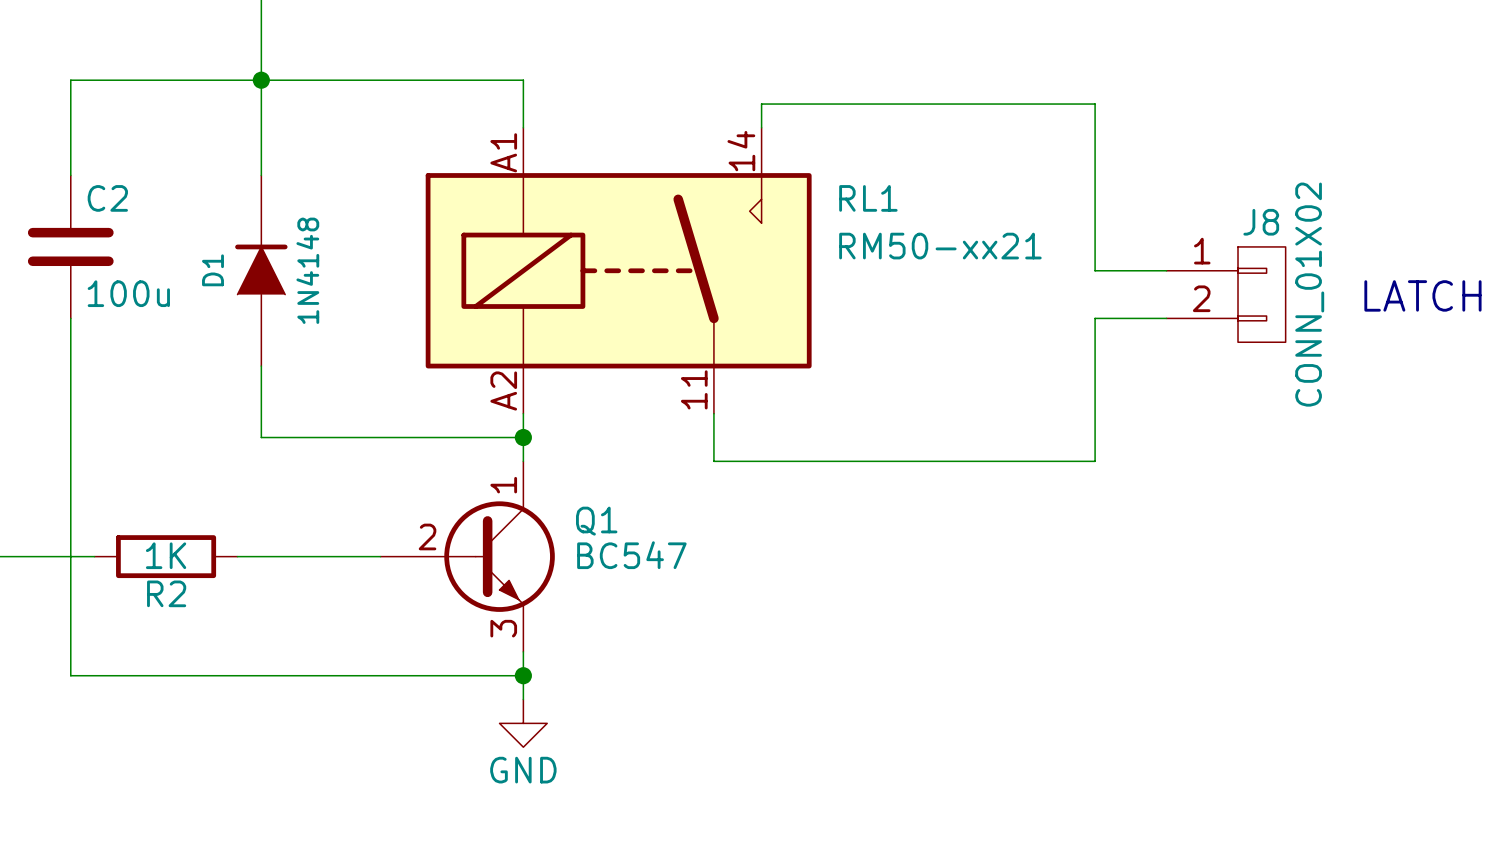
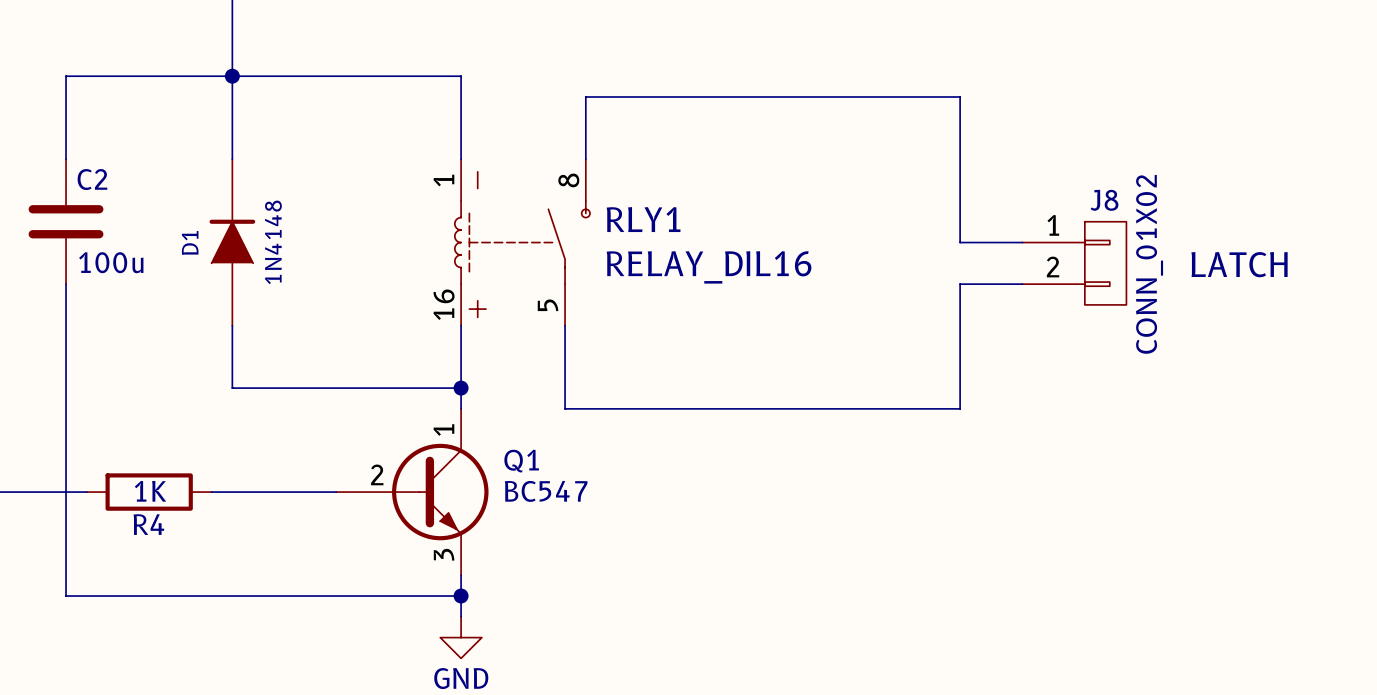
wire: (761, 104) (761, 127) -> (669, 96) (585, 96) (585, 159)
RLY1: none -> RELAY_DIL16 (522, 242)
RL1: RM50-xx21 (618, 270) -> none
wire: (713, 413) (713, 461) -> (565, 325) (565, 408) (627, 408)
R2 name: R2 (166, 593) -> R4 (148, 524)

